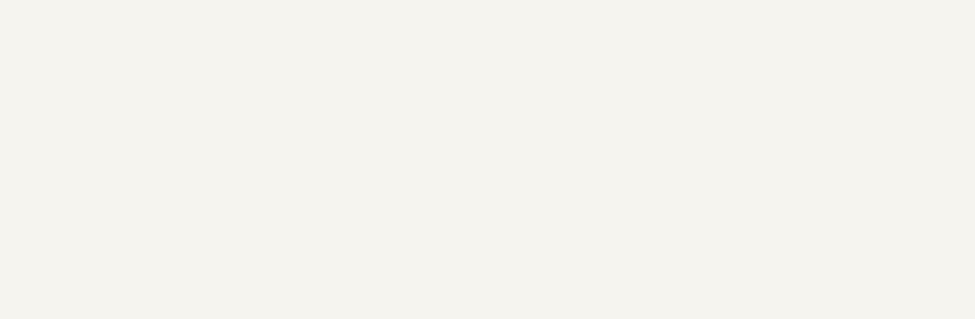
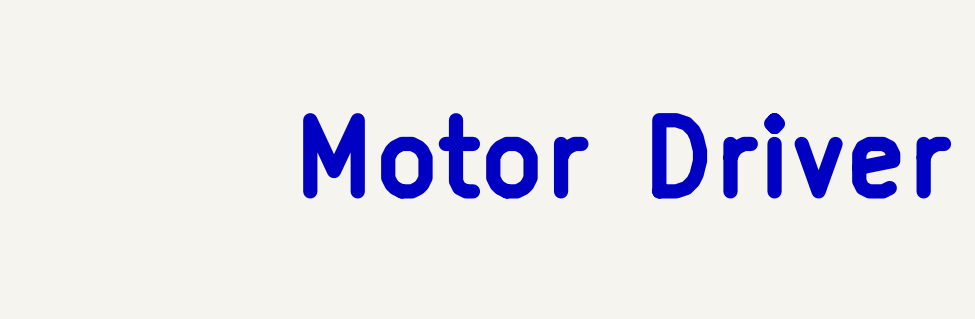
text: none -> Motor Driver (627, 155)

